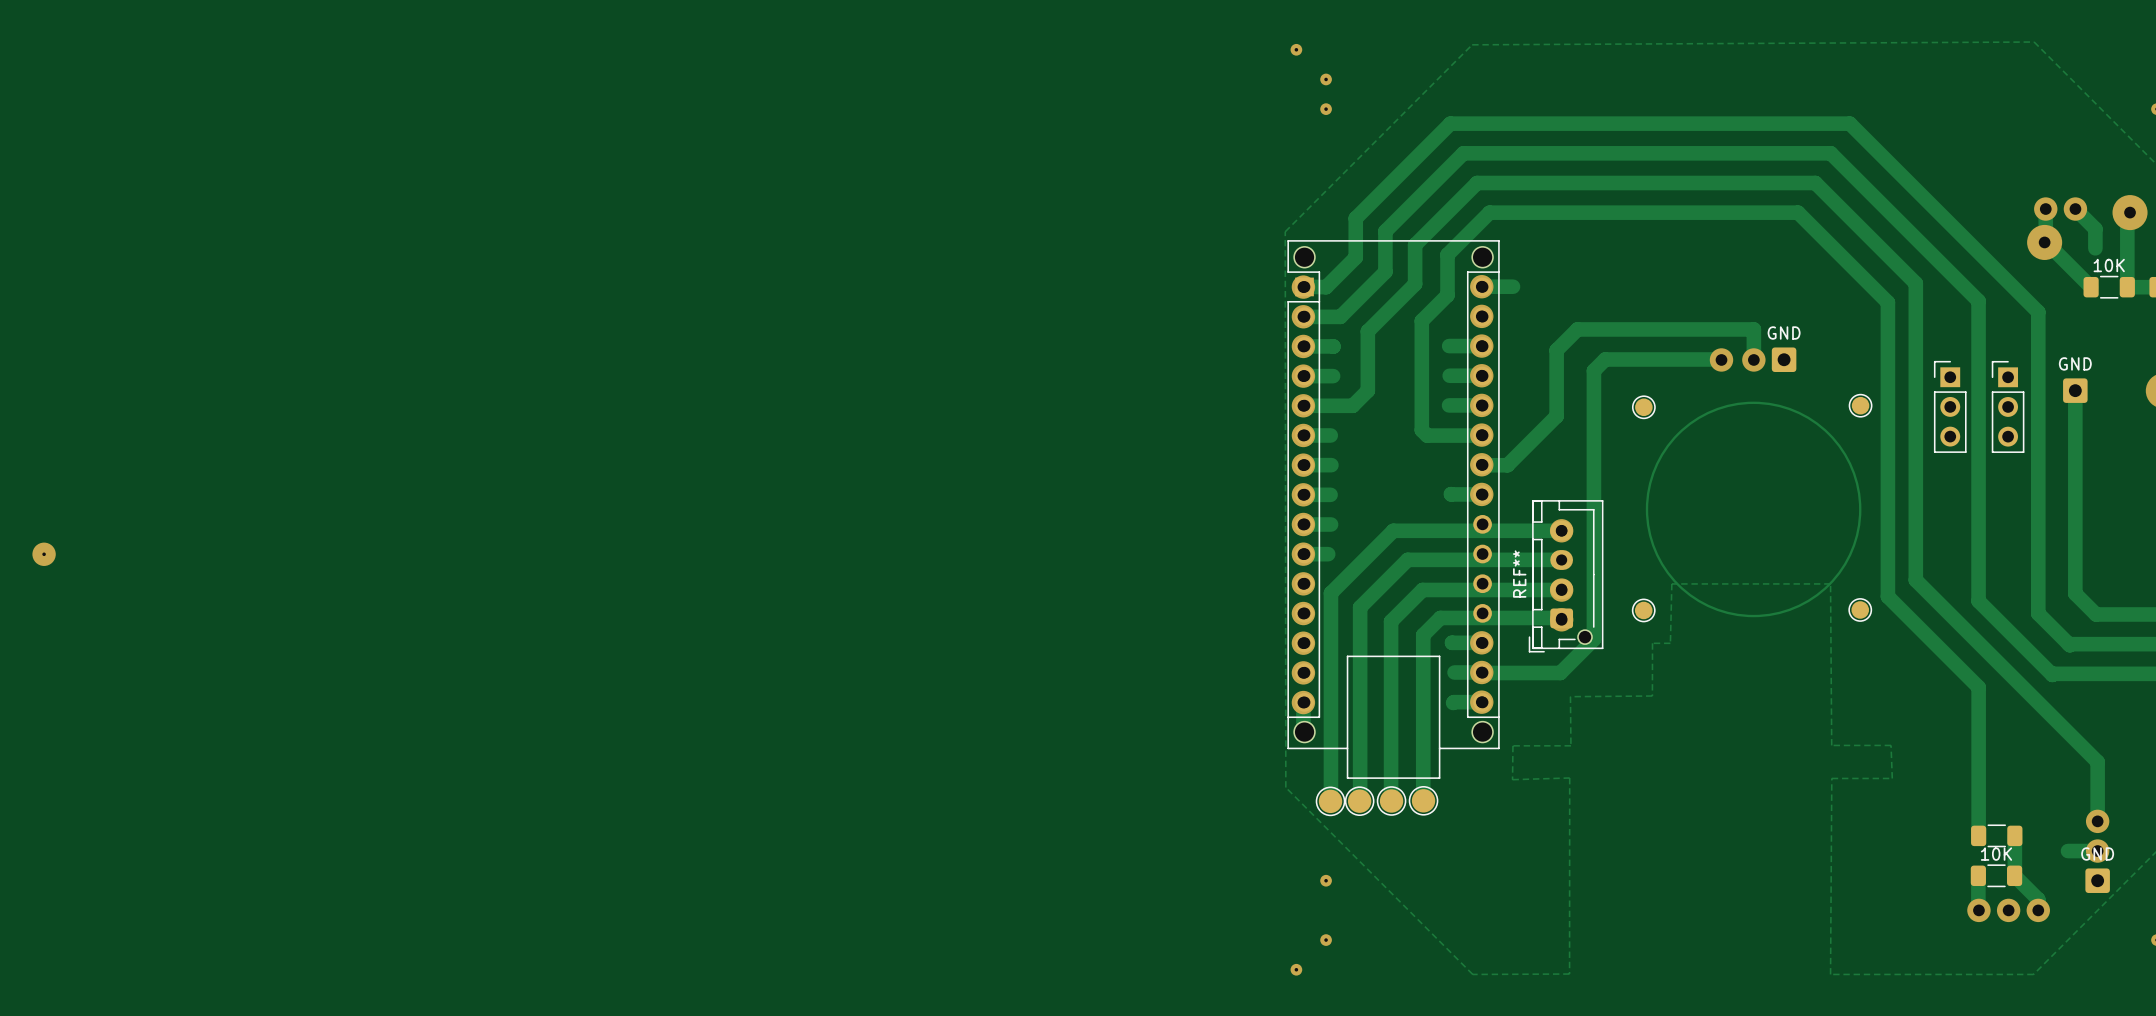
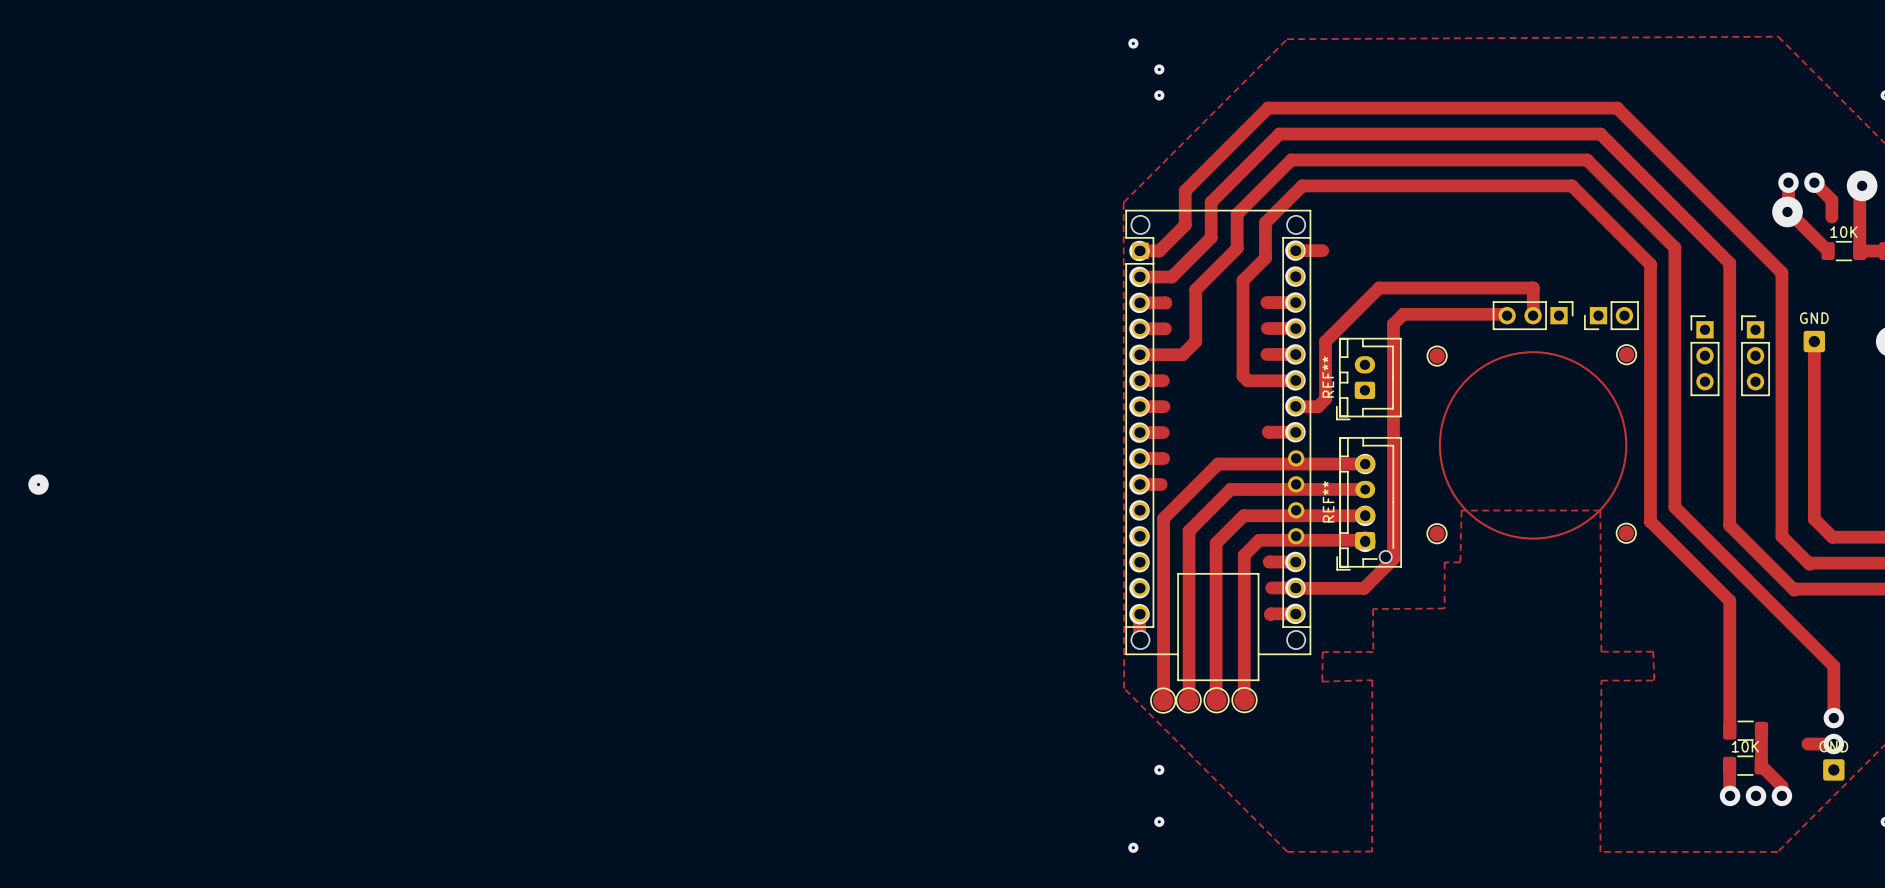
track: (1556, 350) (1556, 416) (1516, 456) -> (1360, 306) (1325, 341) (1325, 399)
via: (1721, 359) -> none
via: (1753, 359) -> none
GND: (1784, 359) -> none
part: none -> (1533, 315)
part: none -> (1611, 315)
REF**: none -> (1368, 379)

